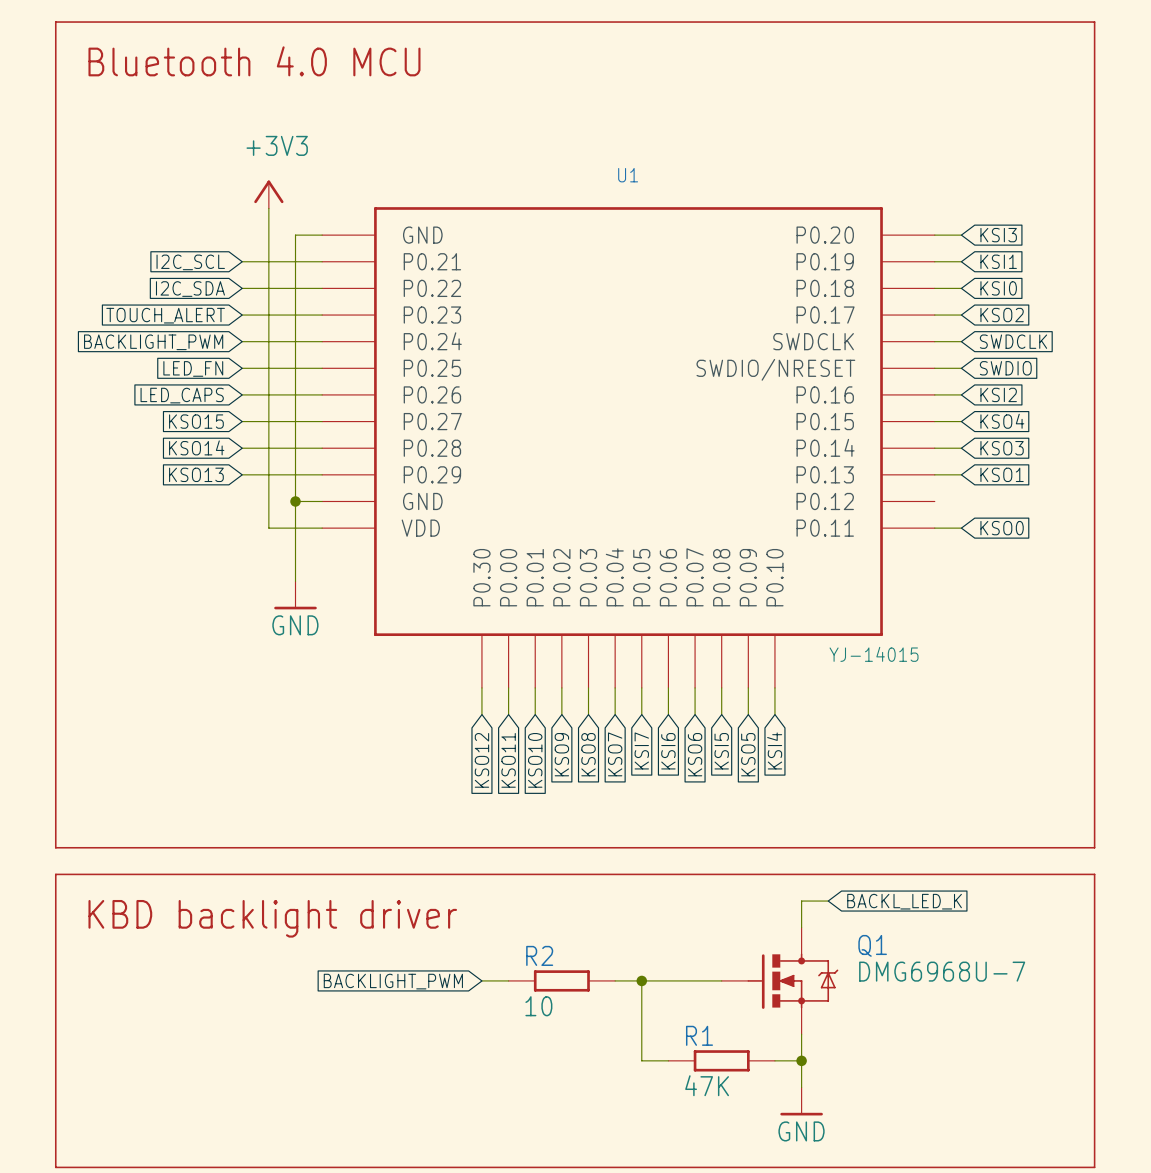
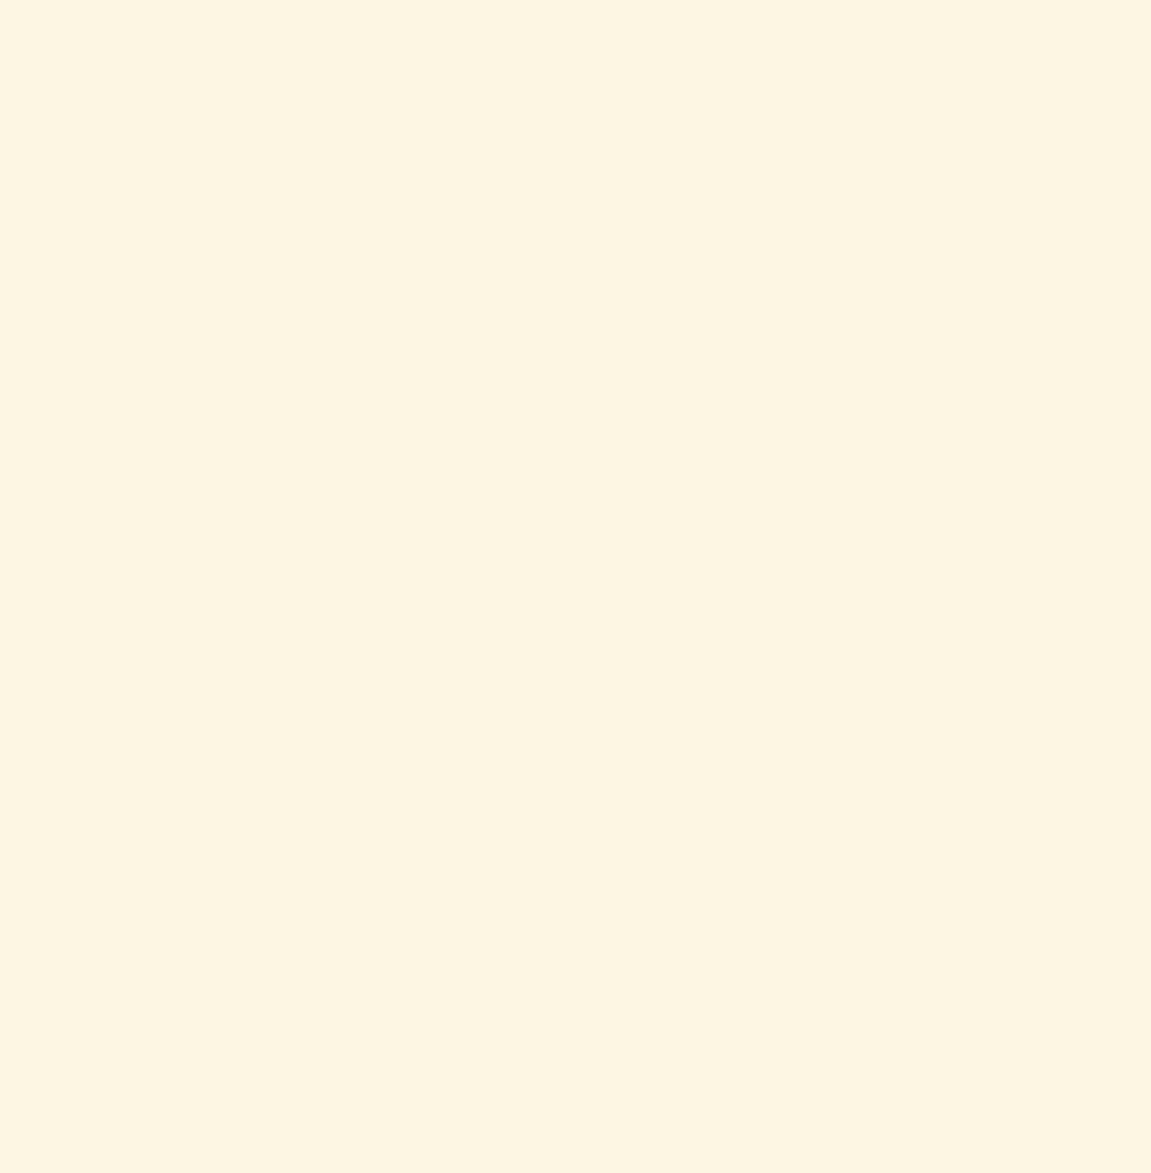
line: (55, 22) (1094, 22) (1094, 847) (55, 847) (55, 22) -> none
text: Bluetooth 4.0 MCU (254, 61) -> none
power symbol: +3V3 (268, 194) -> none
wire: (268, 208) (268, 528) (322, 528) -> none
wire: (322, 235) (295, 235) (295, 581) -> none
wire: (934, 235) (961, 235) -> none
global label: KSI3 (998, 235) -> none
wire: (242, 261) (322, 261) -> none
wire: (934, 261) (961, 261) -> none
global label: KSI1 (998, 261) -> none
global label: I2C_SCL (190, 262) -> none
wire: (242, 288) (322, 288) -> none
wire: (934, 288) (961, 288) -> none
global label: KSI0 (998, 288) -> none
global label: I2C_SDA (190, 289) -> none
global label: TOUCH_ALERT (165, 315) -> none
wire: (242, 315) (322, 315) -> none
wire: (934, 315) (961, 315) -> none
global label: KSO2 (1002, 315) -> none
wire: (242, 341) (322, 341) -> none
wire: (934, 341) (961, 341) -> none
global label: SWDCLK (1013, 341) -> none
global label: BACKLIGHT_PWM (153, 342) -> none
global label: LED_FN (193, 368) -> none
wire: (242, 368) (322, 368) -> none
wire: (934, 368) (961, 368) -> none
global label: SWDIO (1005, 368) -> none
wire: (242, 394) (322, 394) -> none
wire: (934, 394) (961, 394) -> none
global label: KSI2 (998, 394) -> none
global label: LED_CAPS (182, 395) -> none
global label: KSO15 (196, 421) -> none
wire: (242, 421) (322, 421) -> none
wire: (934, 421) (961, 421) -> none
global label: KSO4 (1002, 421) -> none
global label: KSO14 (196, 447) -> none
U1: YJ-14015 (628, 447) -> none
wire: (242, 448) (322, 448) -> none
wire: (934, 448) (961, 448) -> none
global label: KSO3 (1002, 448) -> none
global label: KSO13 (196, 474) -> none
wire: (242, 474) (322, 474) -> none
wire: (934, 474) (961, 474) -> none
global label: KSO1 (1002, 474) -> none
wire: (295, 501) (322, 501) -> none
junction: (295, 501) -> none
wire: (934, 528) (961, 528) -> none
global label: KSO0 (1002, 528) -> none
power symbol: GND (295, 595) -> none
wire: (481, 687) (481, 714) -> none
wire: (508, 687) (508, 714) -> none
wire: (535, 687) (535, 714) -> none
wire: (561, 687) (561, 714) -> none
wire: (588, 687) (588, 714) -> none
wire: (615, 687) (615, 714) -> none
wire: (641, 687) (641, 714) -> none
wire: (668, 687) (668, 714) -> none
wire: (695, 687) (695, 714) -> none
wire: (721, 687) (721, 714) -> none
wire: (748, 687) (748, 714) -> none
wire: (774, 687) (774, 714) -> none
global label: KSI7 (641, 750) -> none
global label: KSI4 (774, 750) -> none
global label: KSI6 (668, 751) -> none
global label: KSI5 (721, 751) -> none
global label: KSO9 (561, 754) -> none
global label: KSO8 (588, 754) -> none
global label: KSO7 (615, 754) -> none
global label: KSO6 (695, 754) -> none
global label: KSO5 (748, 754) -> none
global label: KSO12 (481, 760) -> none
global label: KSO11 (508, 760) -> none
global label: KSO10 (535, 760) -> none
line: (55, 874) (55, 1167) (1094, 1167) (1094, 874) (55, 874) -> none
wire: (828, 901) (801, 901) (801, 927) -> none
global label: BACKL_LED_K (904, 901) -> none
text: KBD backlight driver (272, 918) -> none
wire: (481, 980) (508, 980) -> none
R2: 10 (561, 980) -> none
wire: (615, 980) (721, 980) -> none
wire: (641, 980) (641, 1060) (668, 1060) -> none
junction: (641, 980) -> none
Q1: DMG6968U-7 (780, 980) -> none
global label: BACKLIGHT_PWM (393, 981) -> none
wire: (801, 1034) (801, 1087) -> none
R1: 47K (721, 1060) -> none
wire: (774, 1060) (801, 1060) -> none
junction: (801, 1060) -> none
power symbol: GND (801, 1101) -> none

